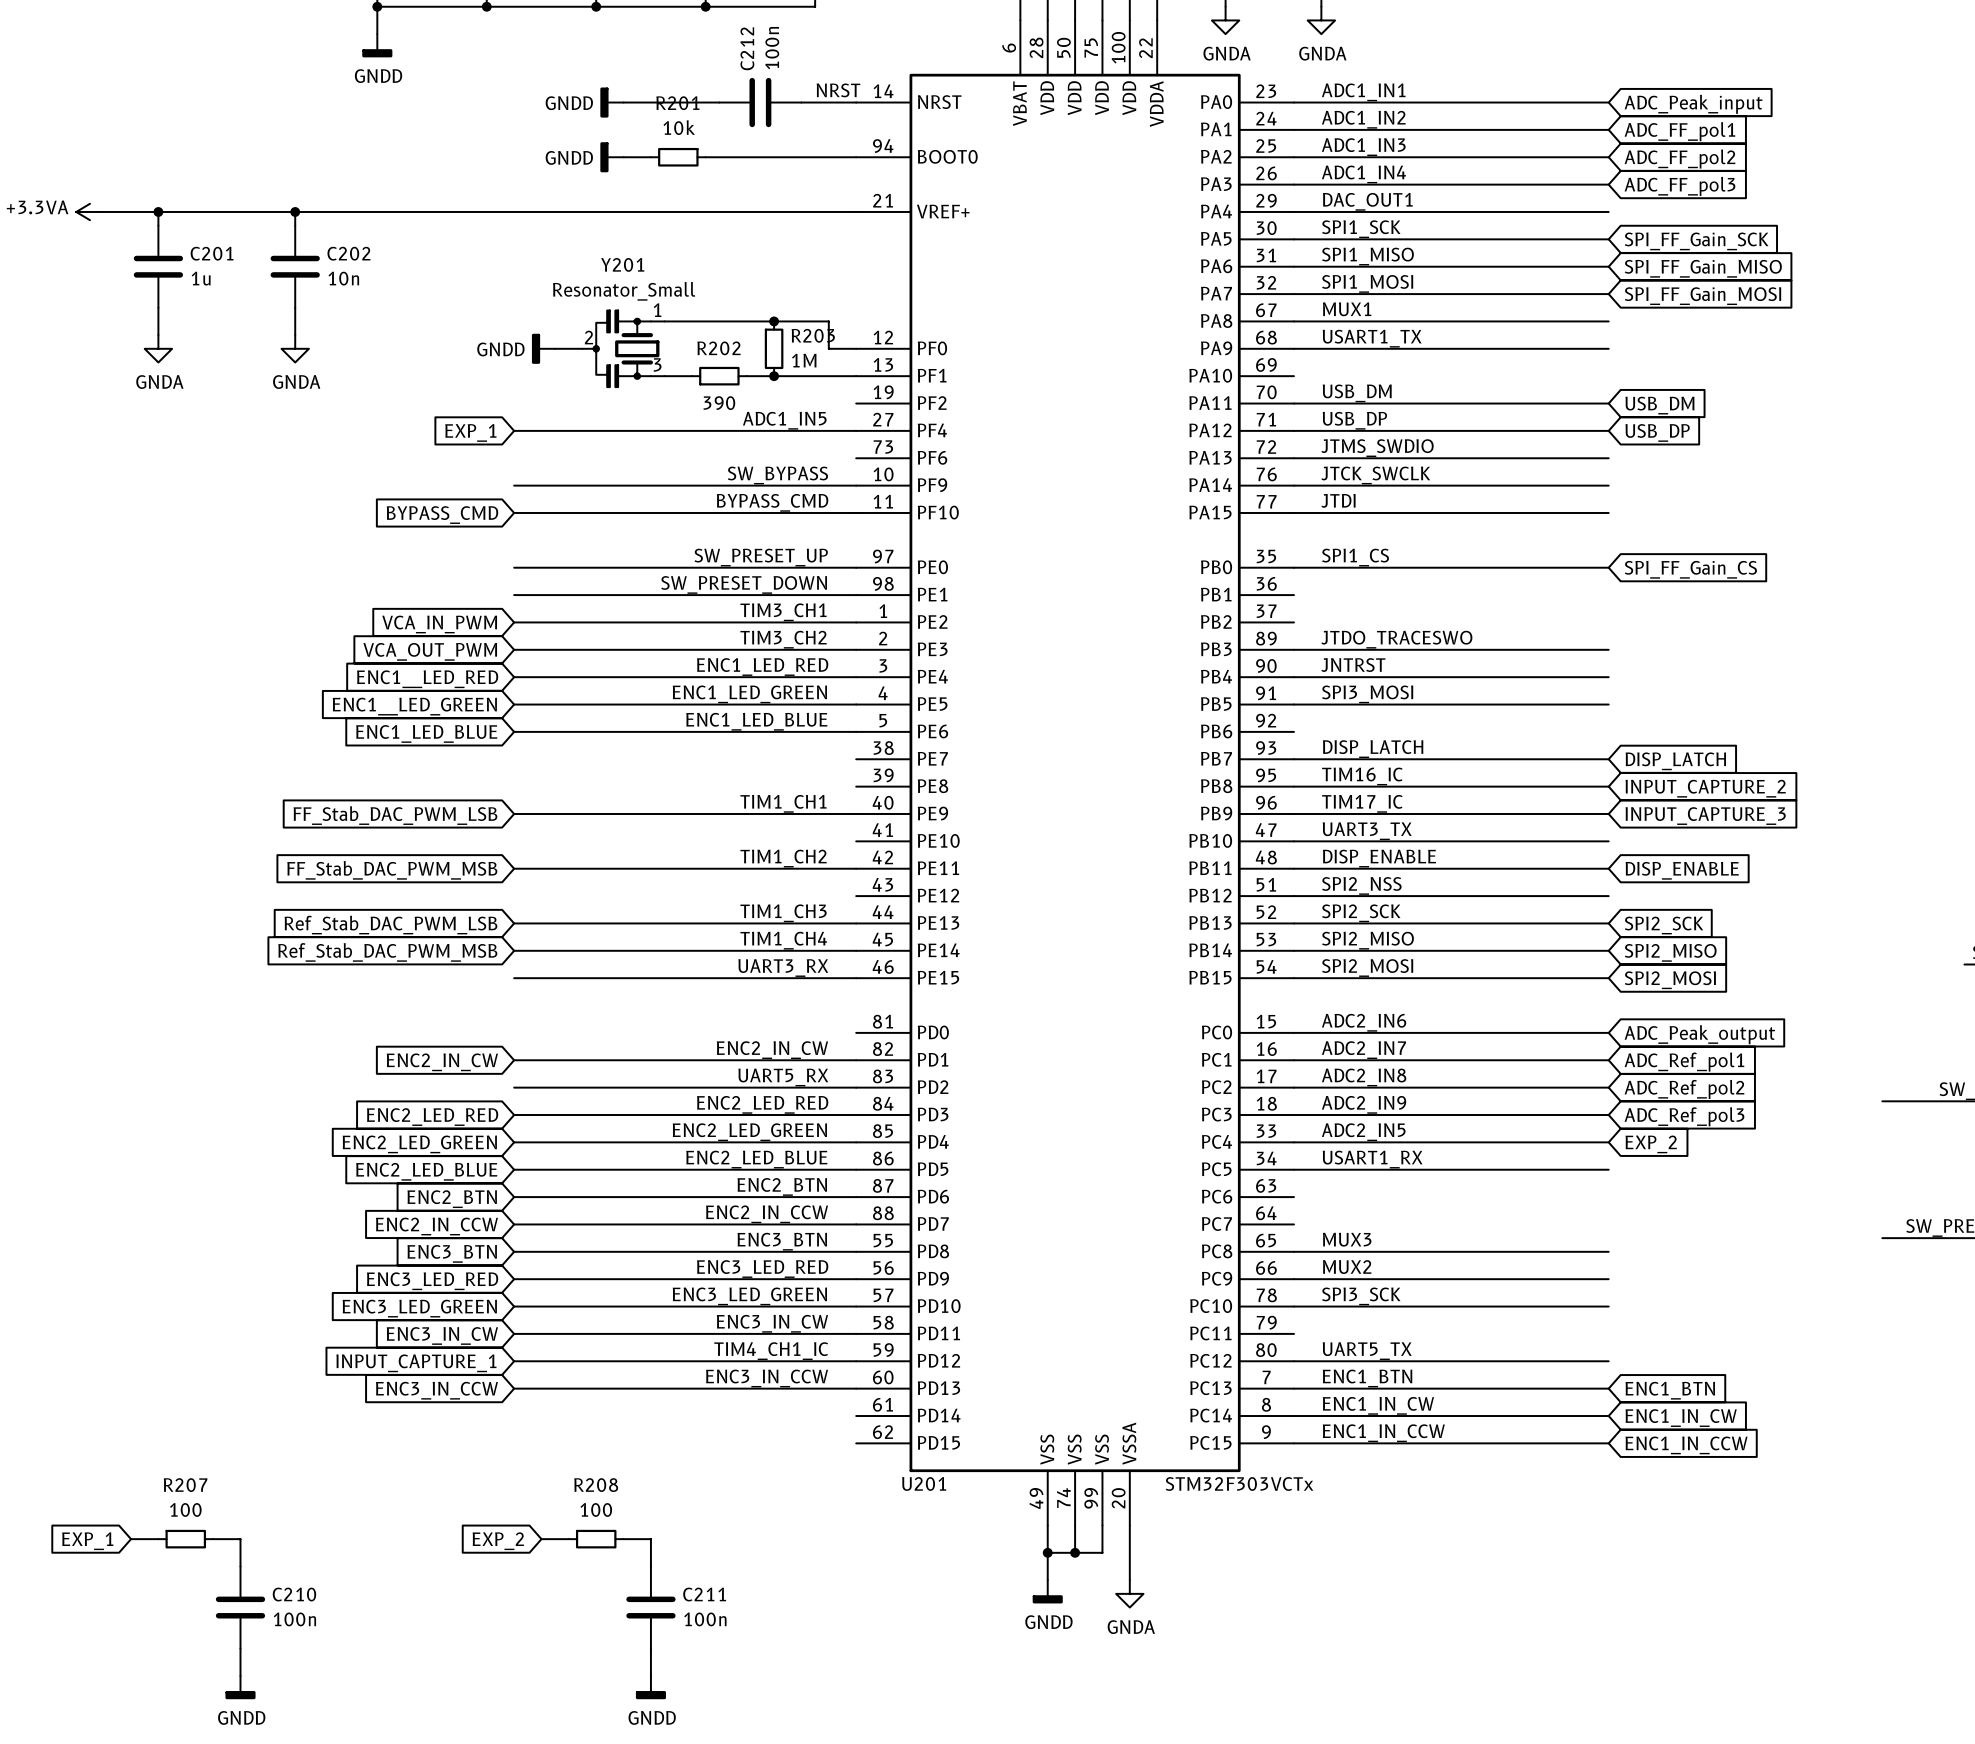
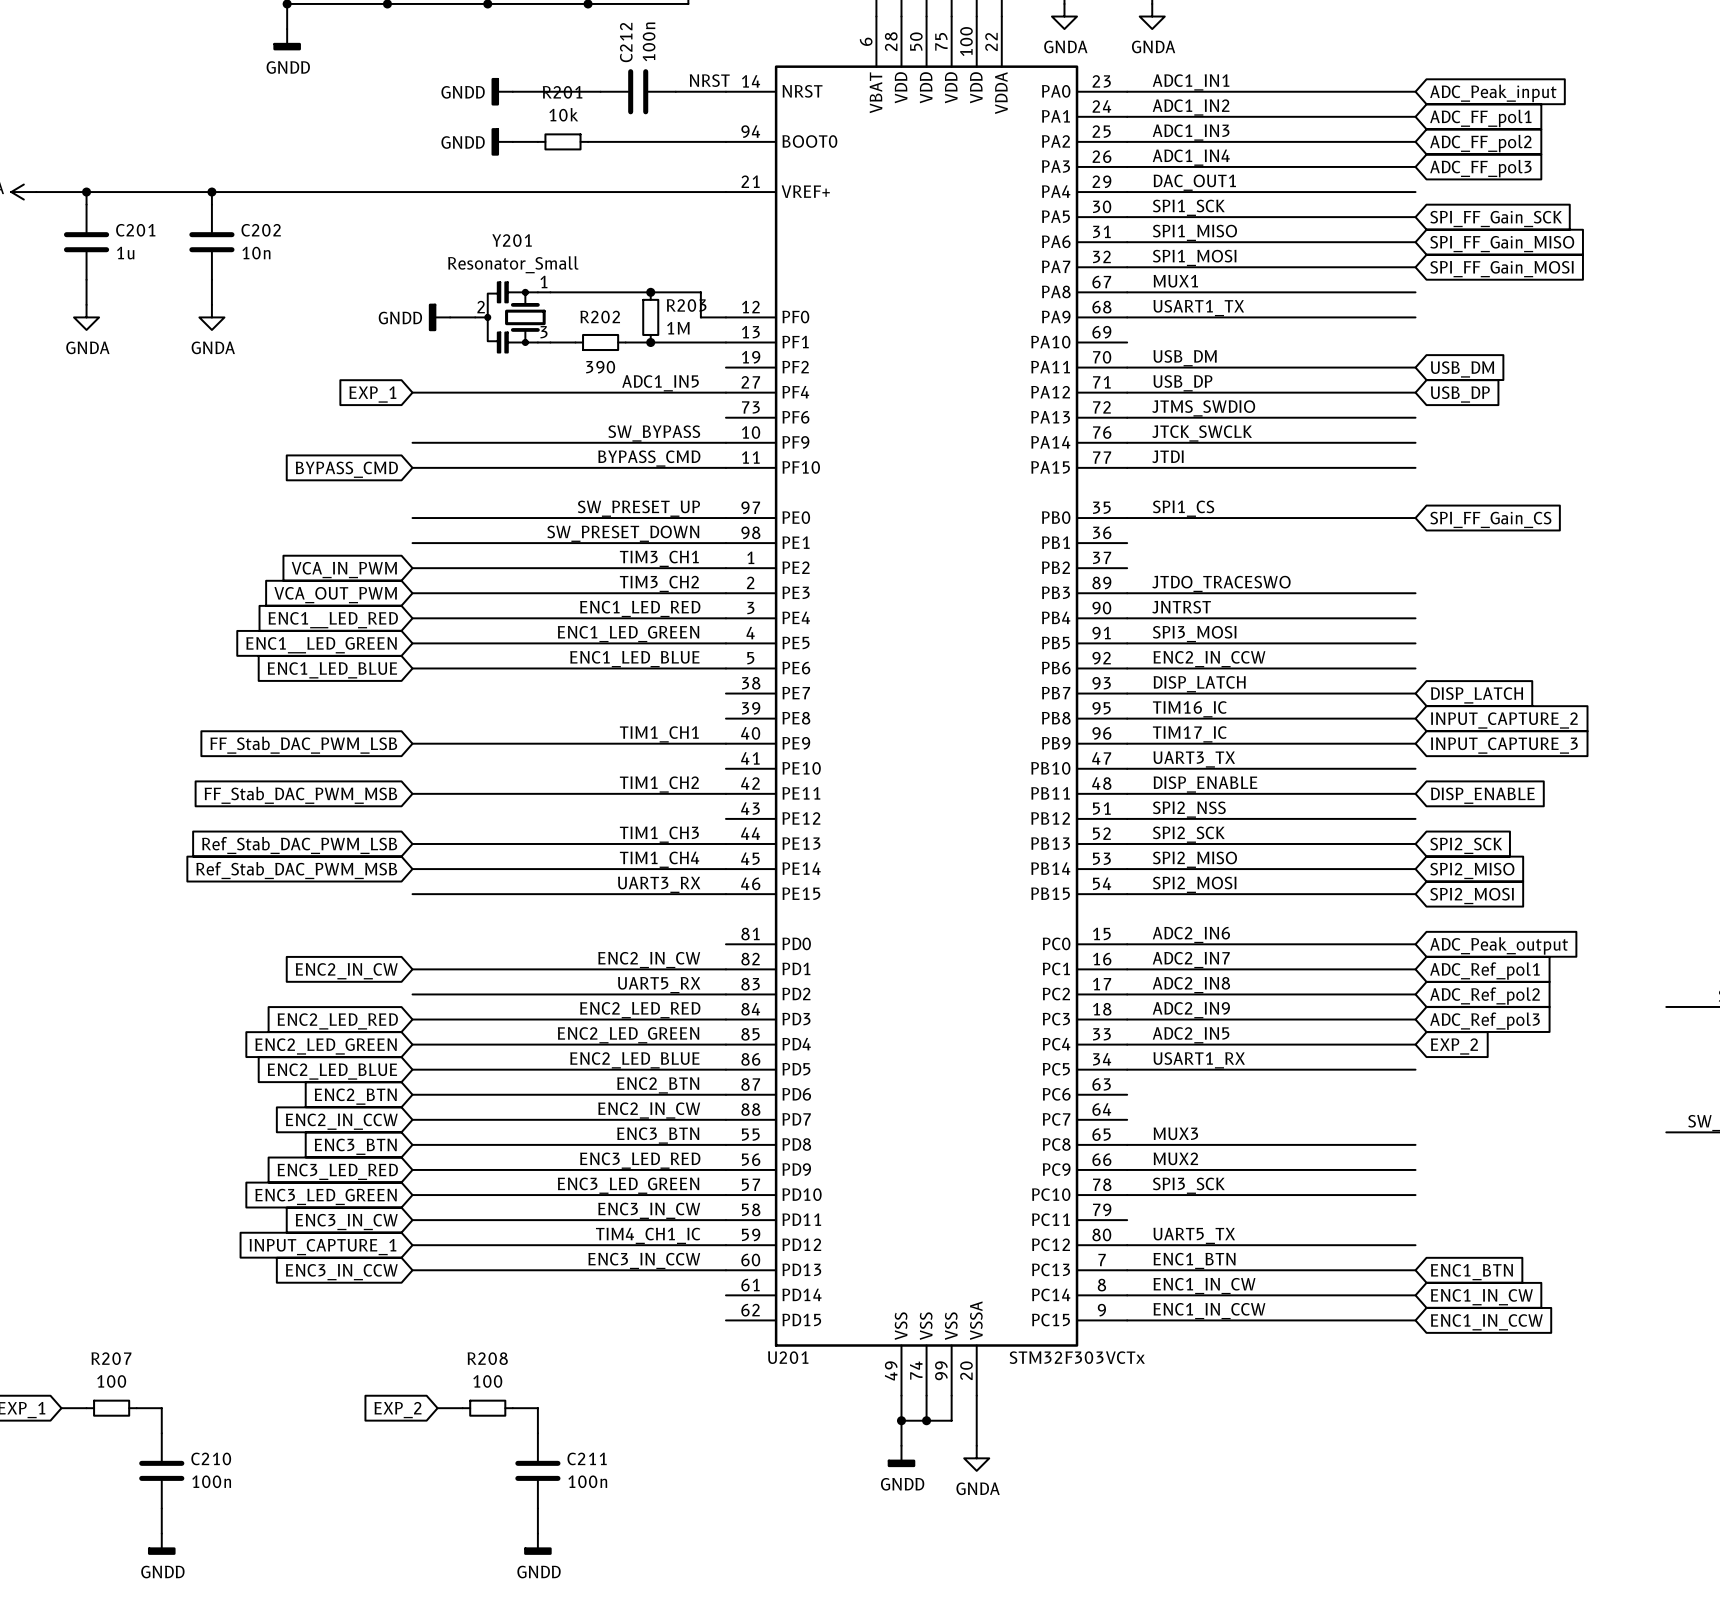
label: none -> ENC2_IN_CCW (1209, 659)
wire: none -> (1127, 668) (1415, 668)
label: ENC2_IN_CCW (767, 1214) -> ENC2_IN_CW (649, 1110)

